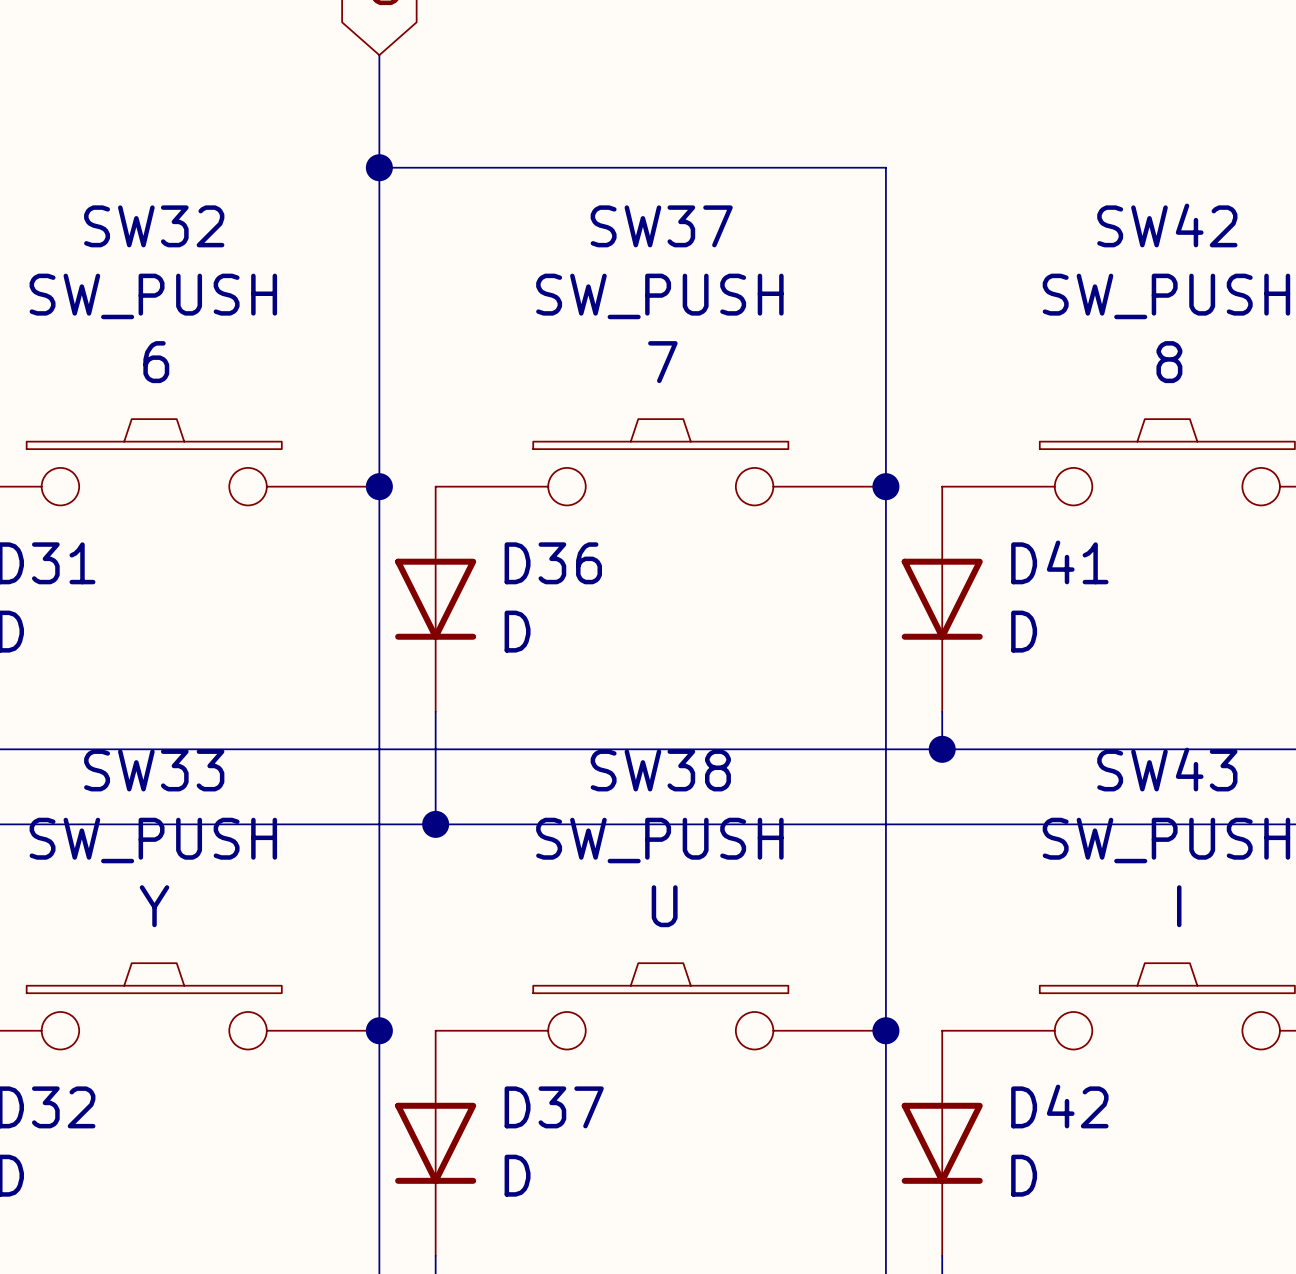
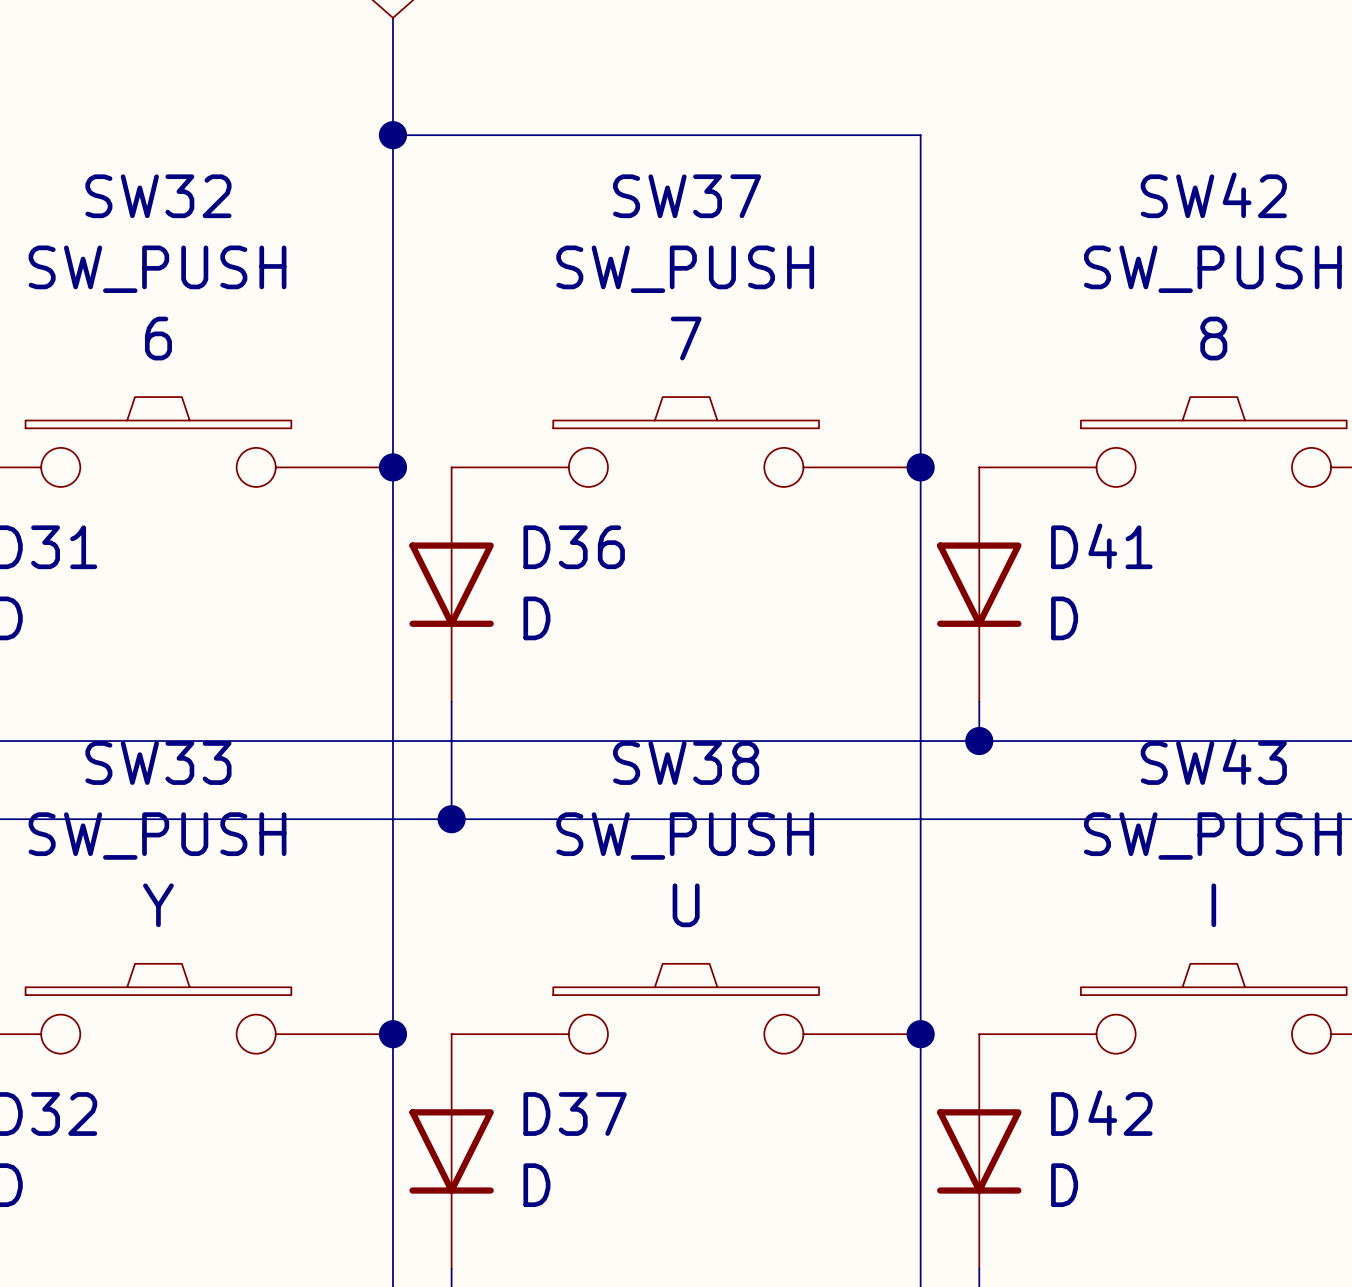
SW32 text: none -> 6 (158, 338)
text: 6 (156, 362) -> none
SW37 text: none -> 7 (686, 338)
text: 7 (662, 362) -> none
SW42 text: none -> 8 (1213, 338)
text: 8 (1169, 362) -> none
text: Y (154, 906) -> none
text: U (664, 906) -> none
text: I (1179, 906) -> none
SW33 text: none -> Y (158, 905)
SW38 text: none -> U (686, 905)
SW43 text: none -> I (1213, 905)

